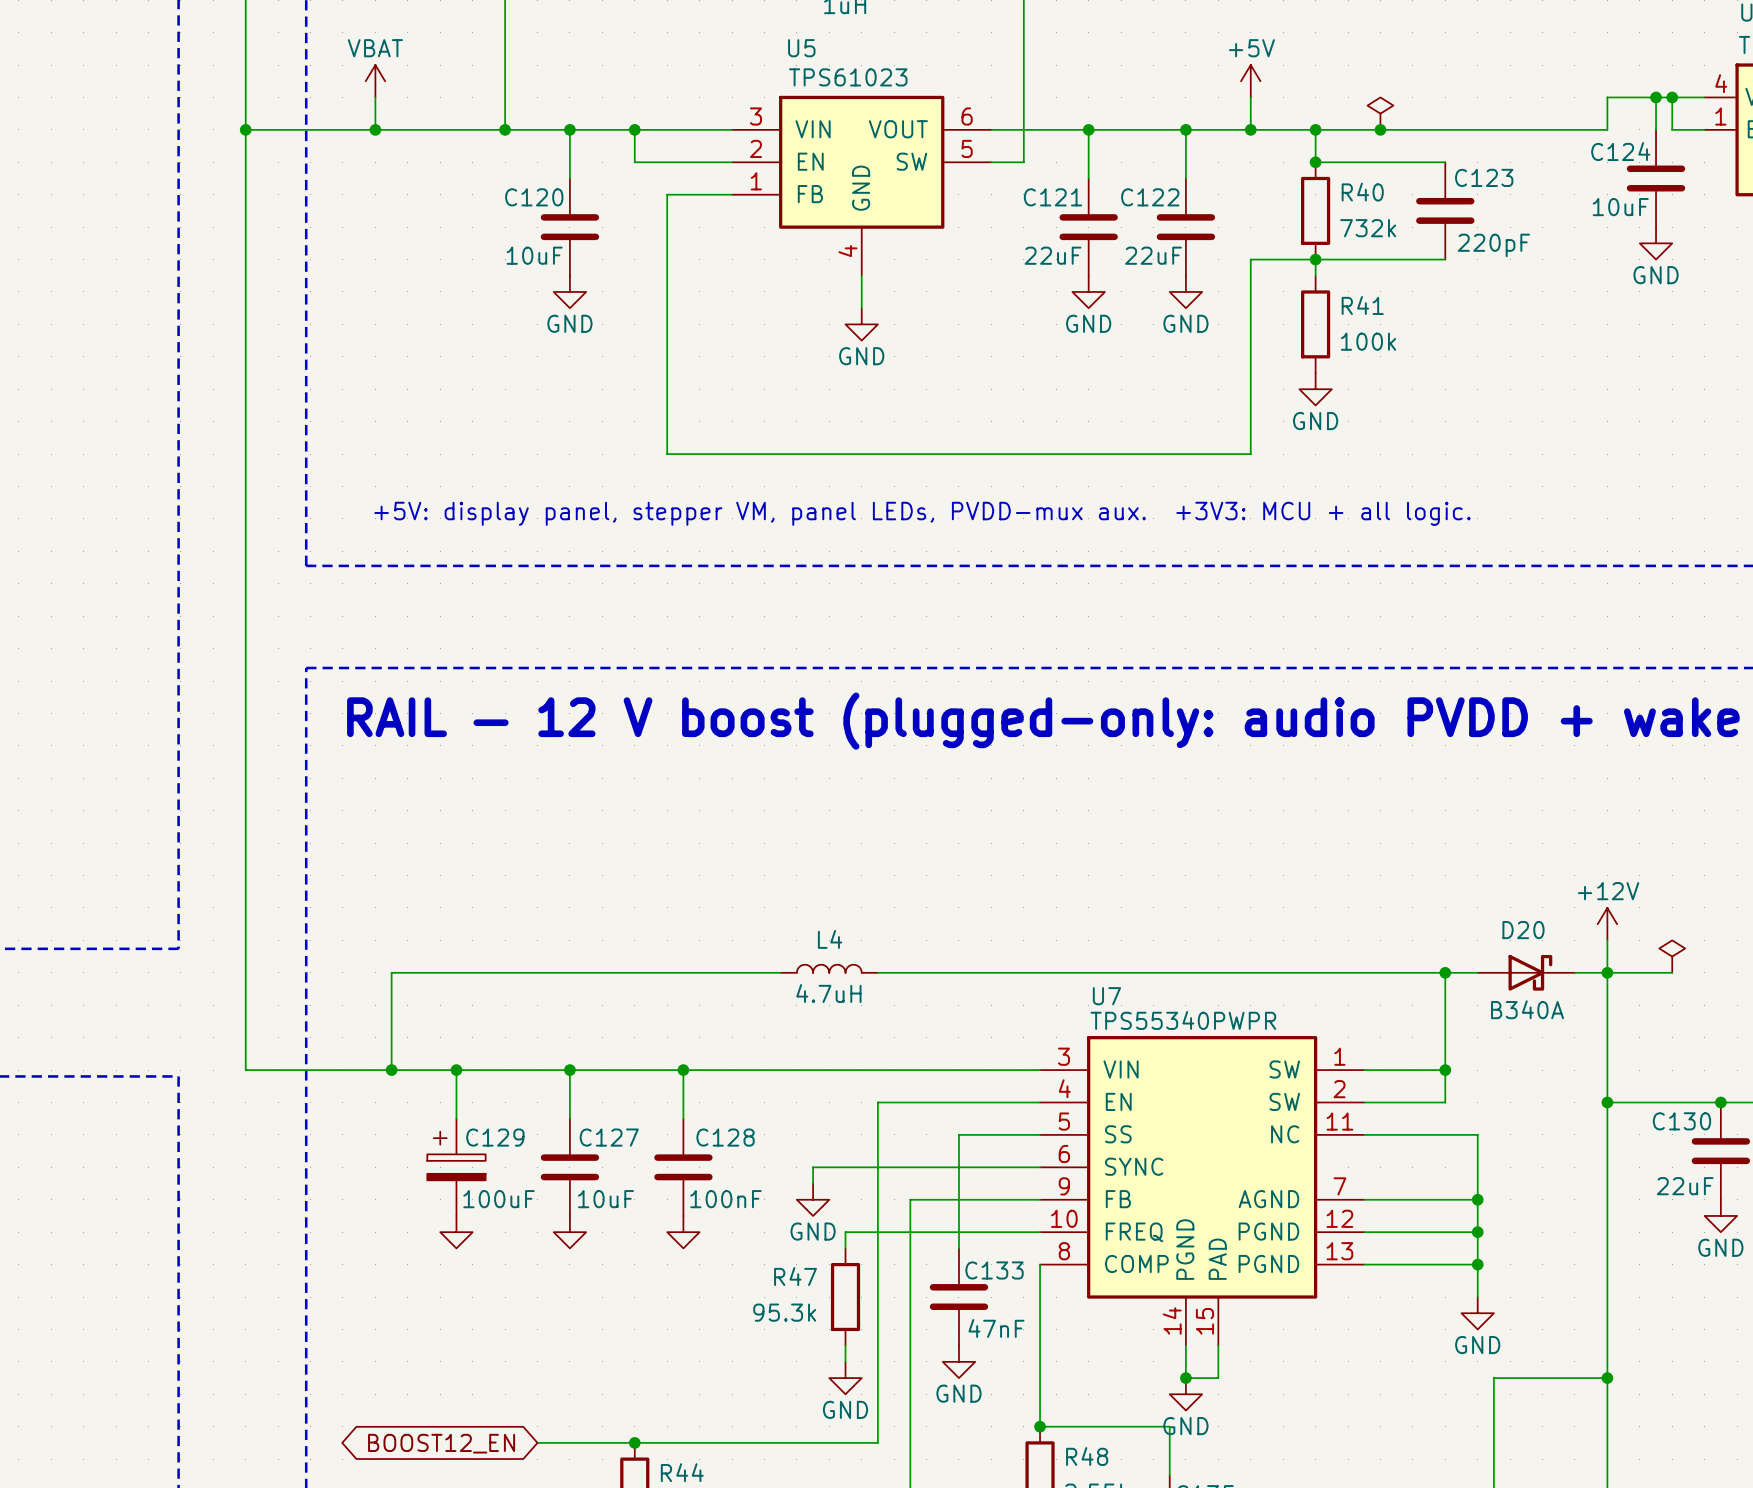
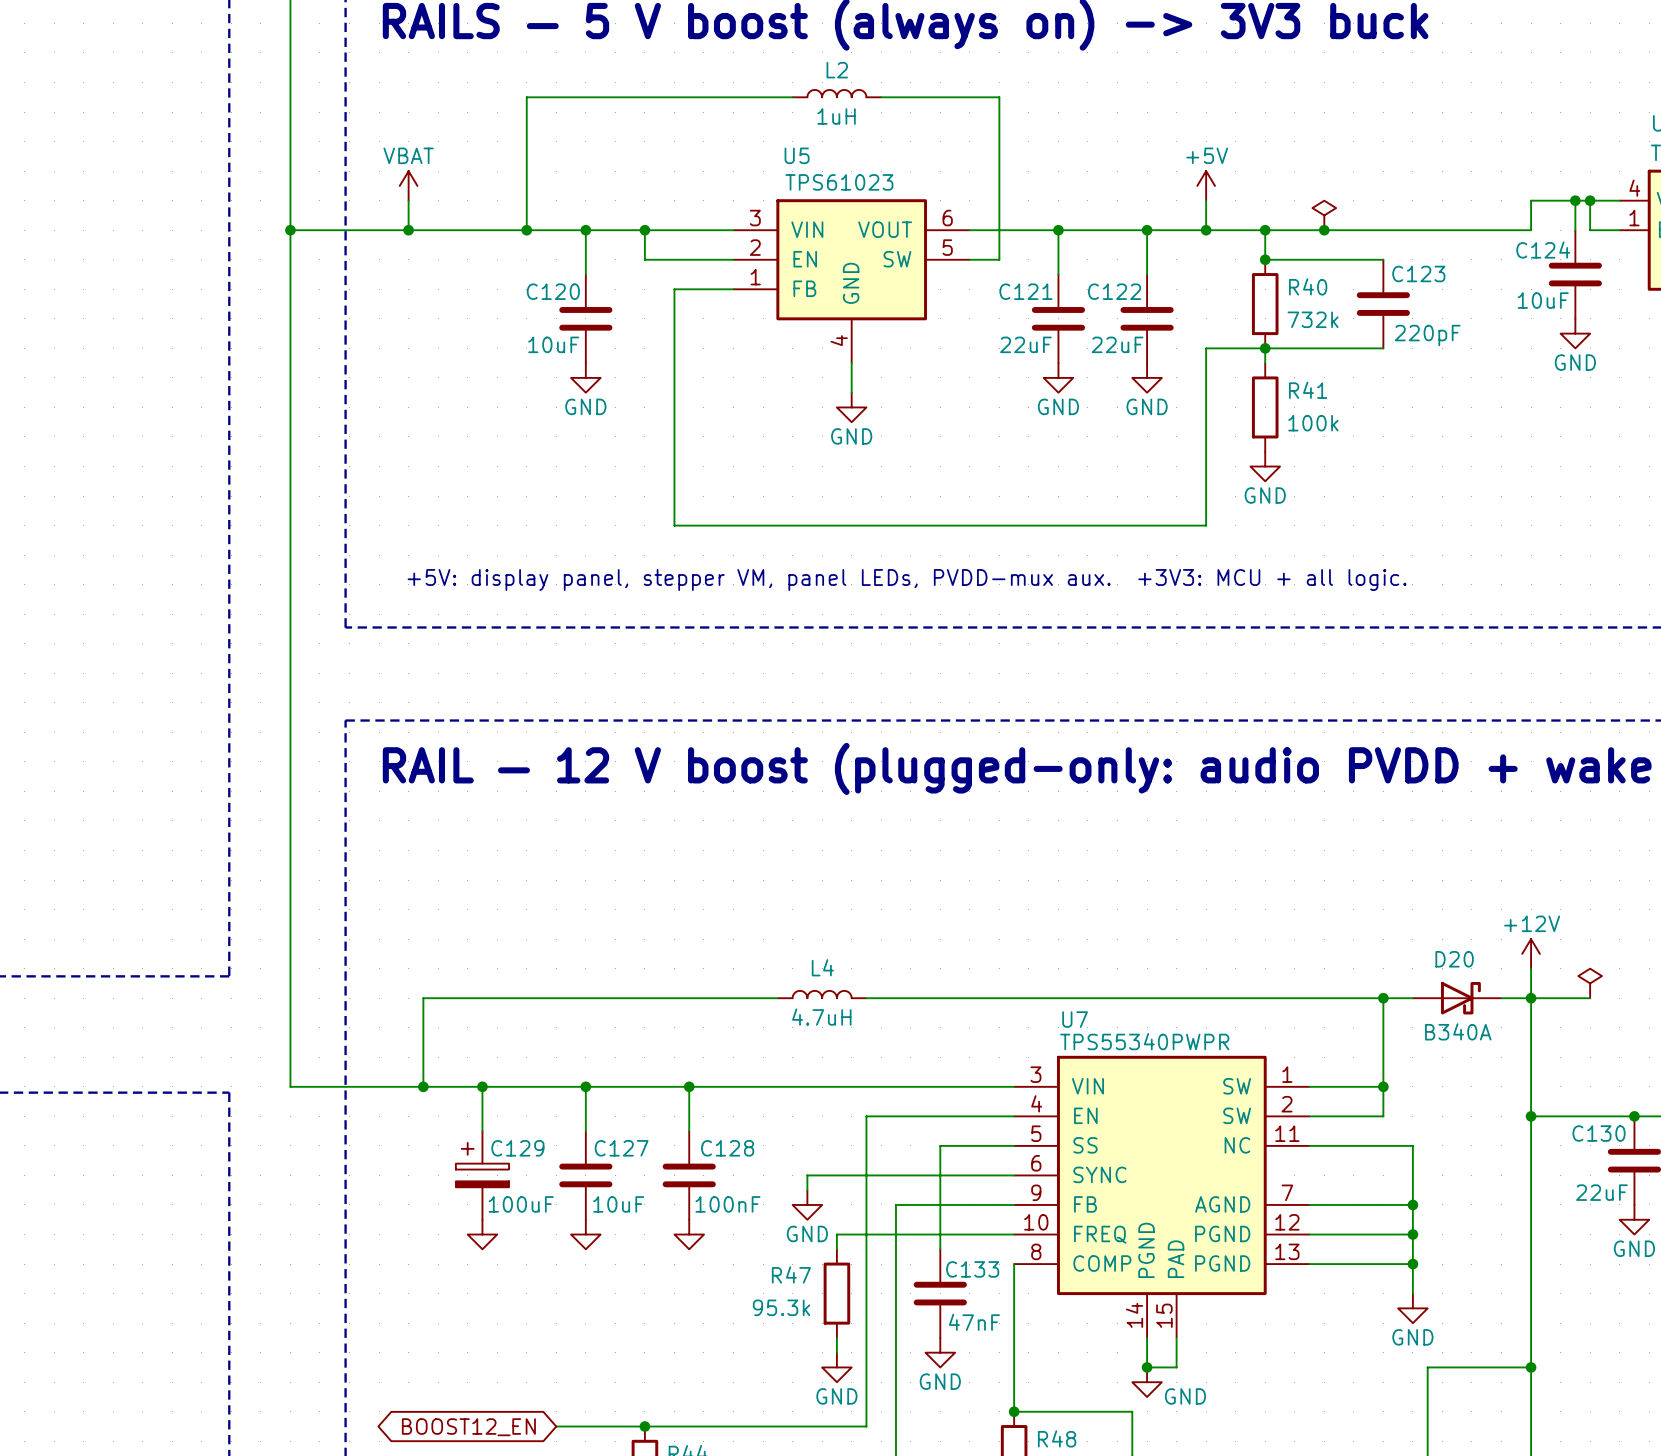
power symbol text position: GND (1185, 1426) -> GND (1185, 1396)

